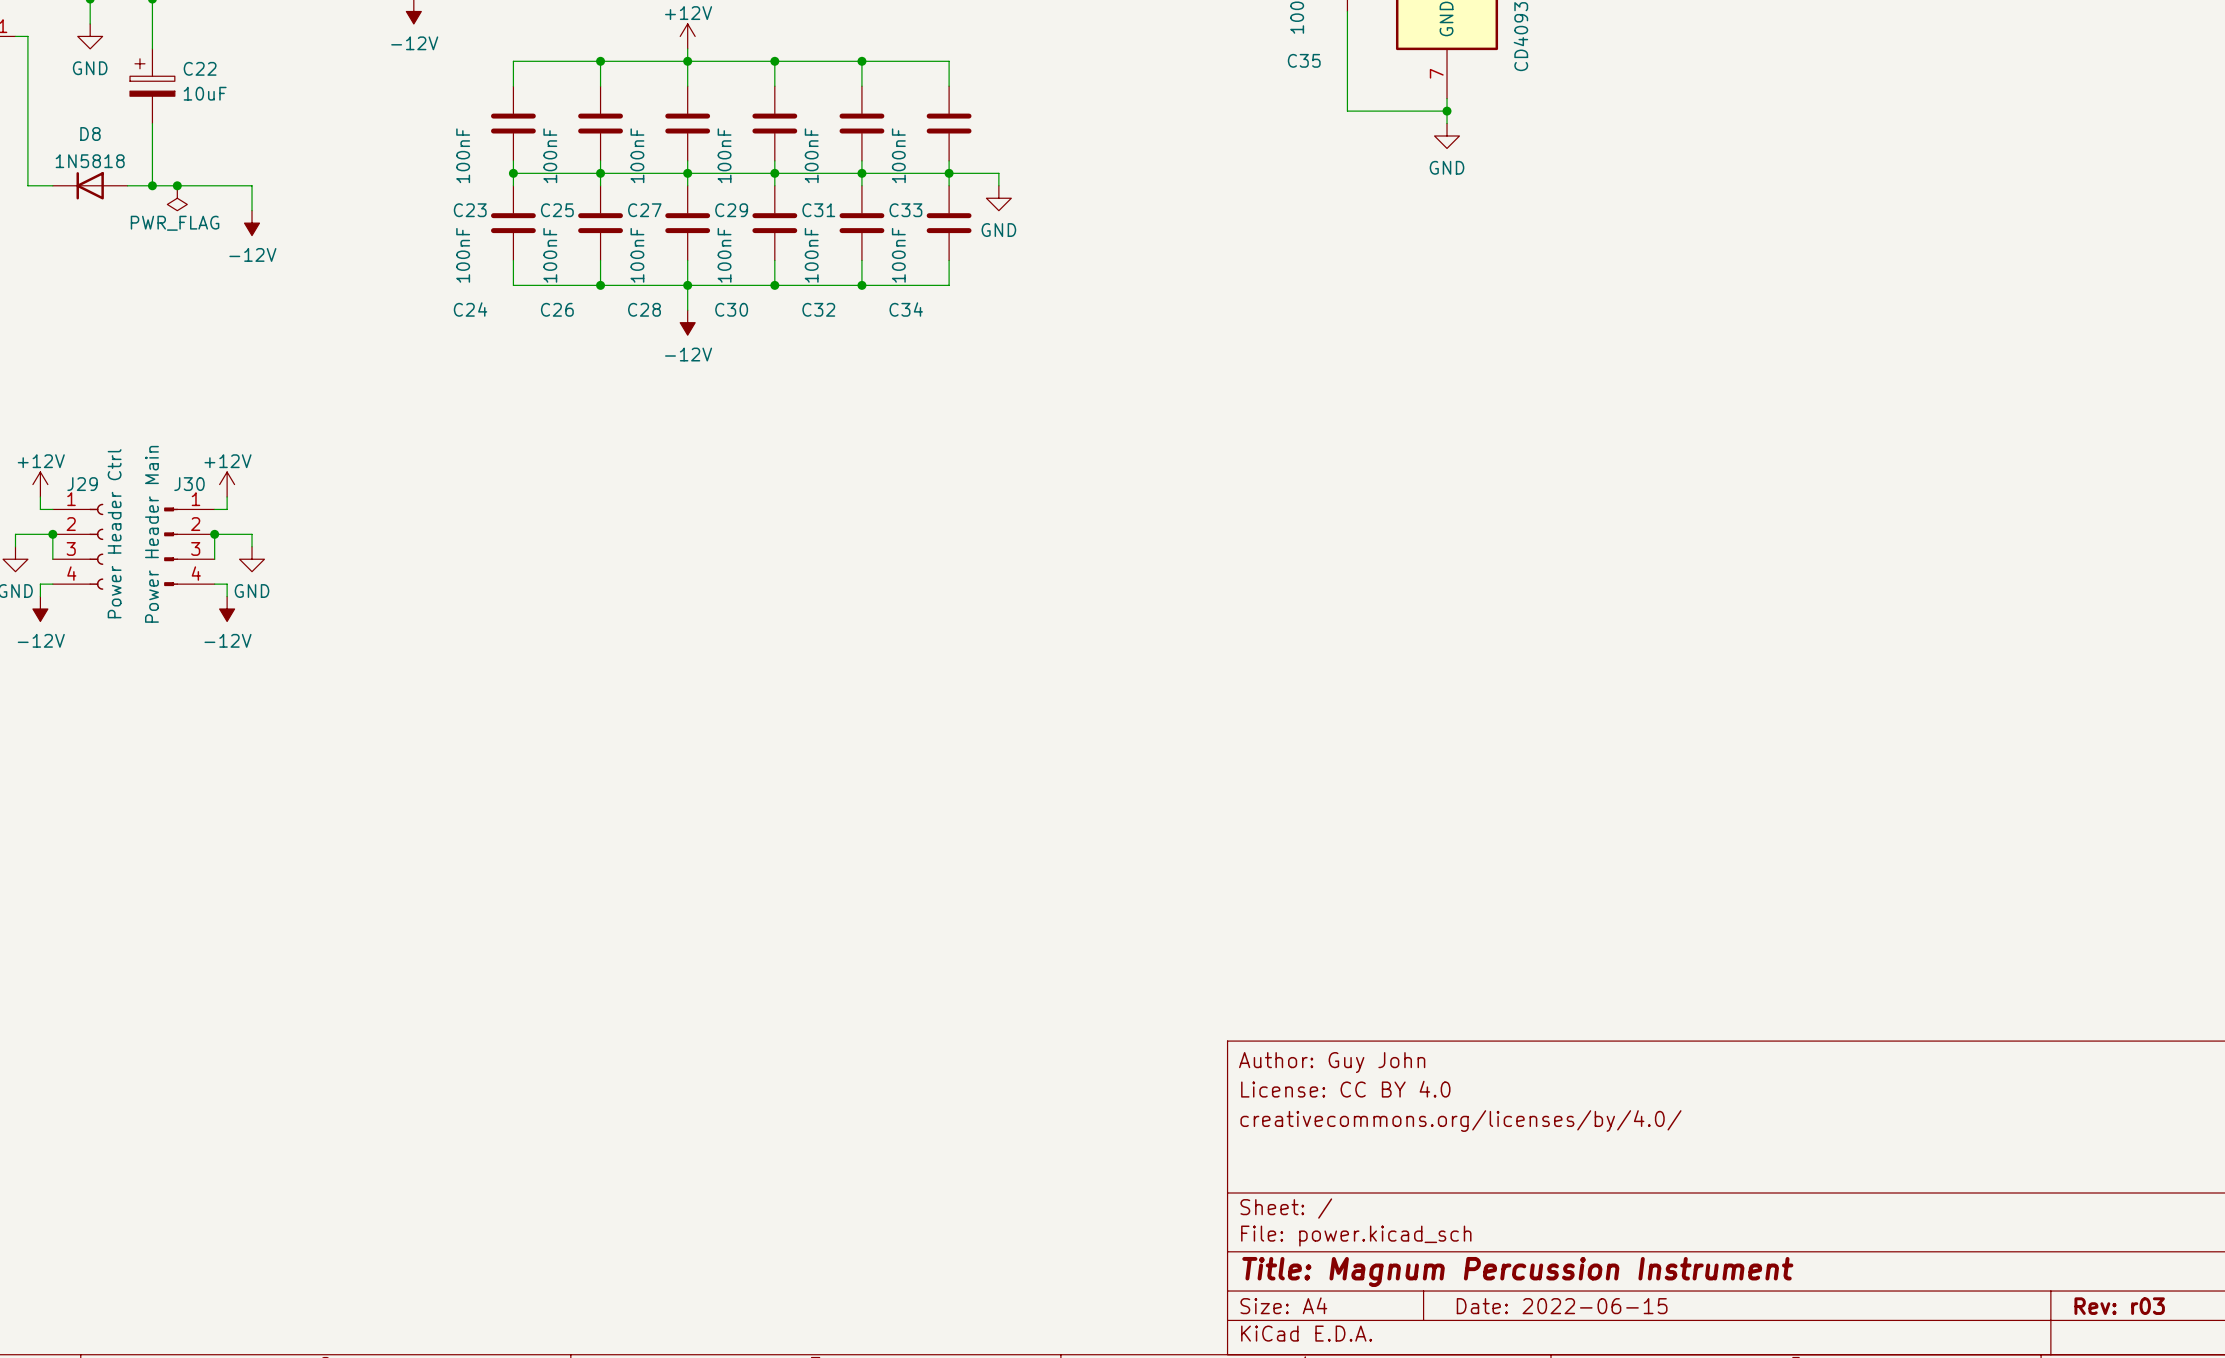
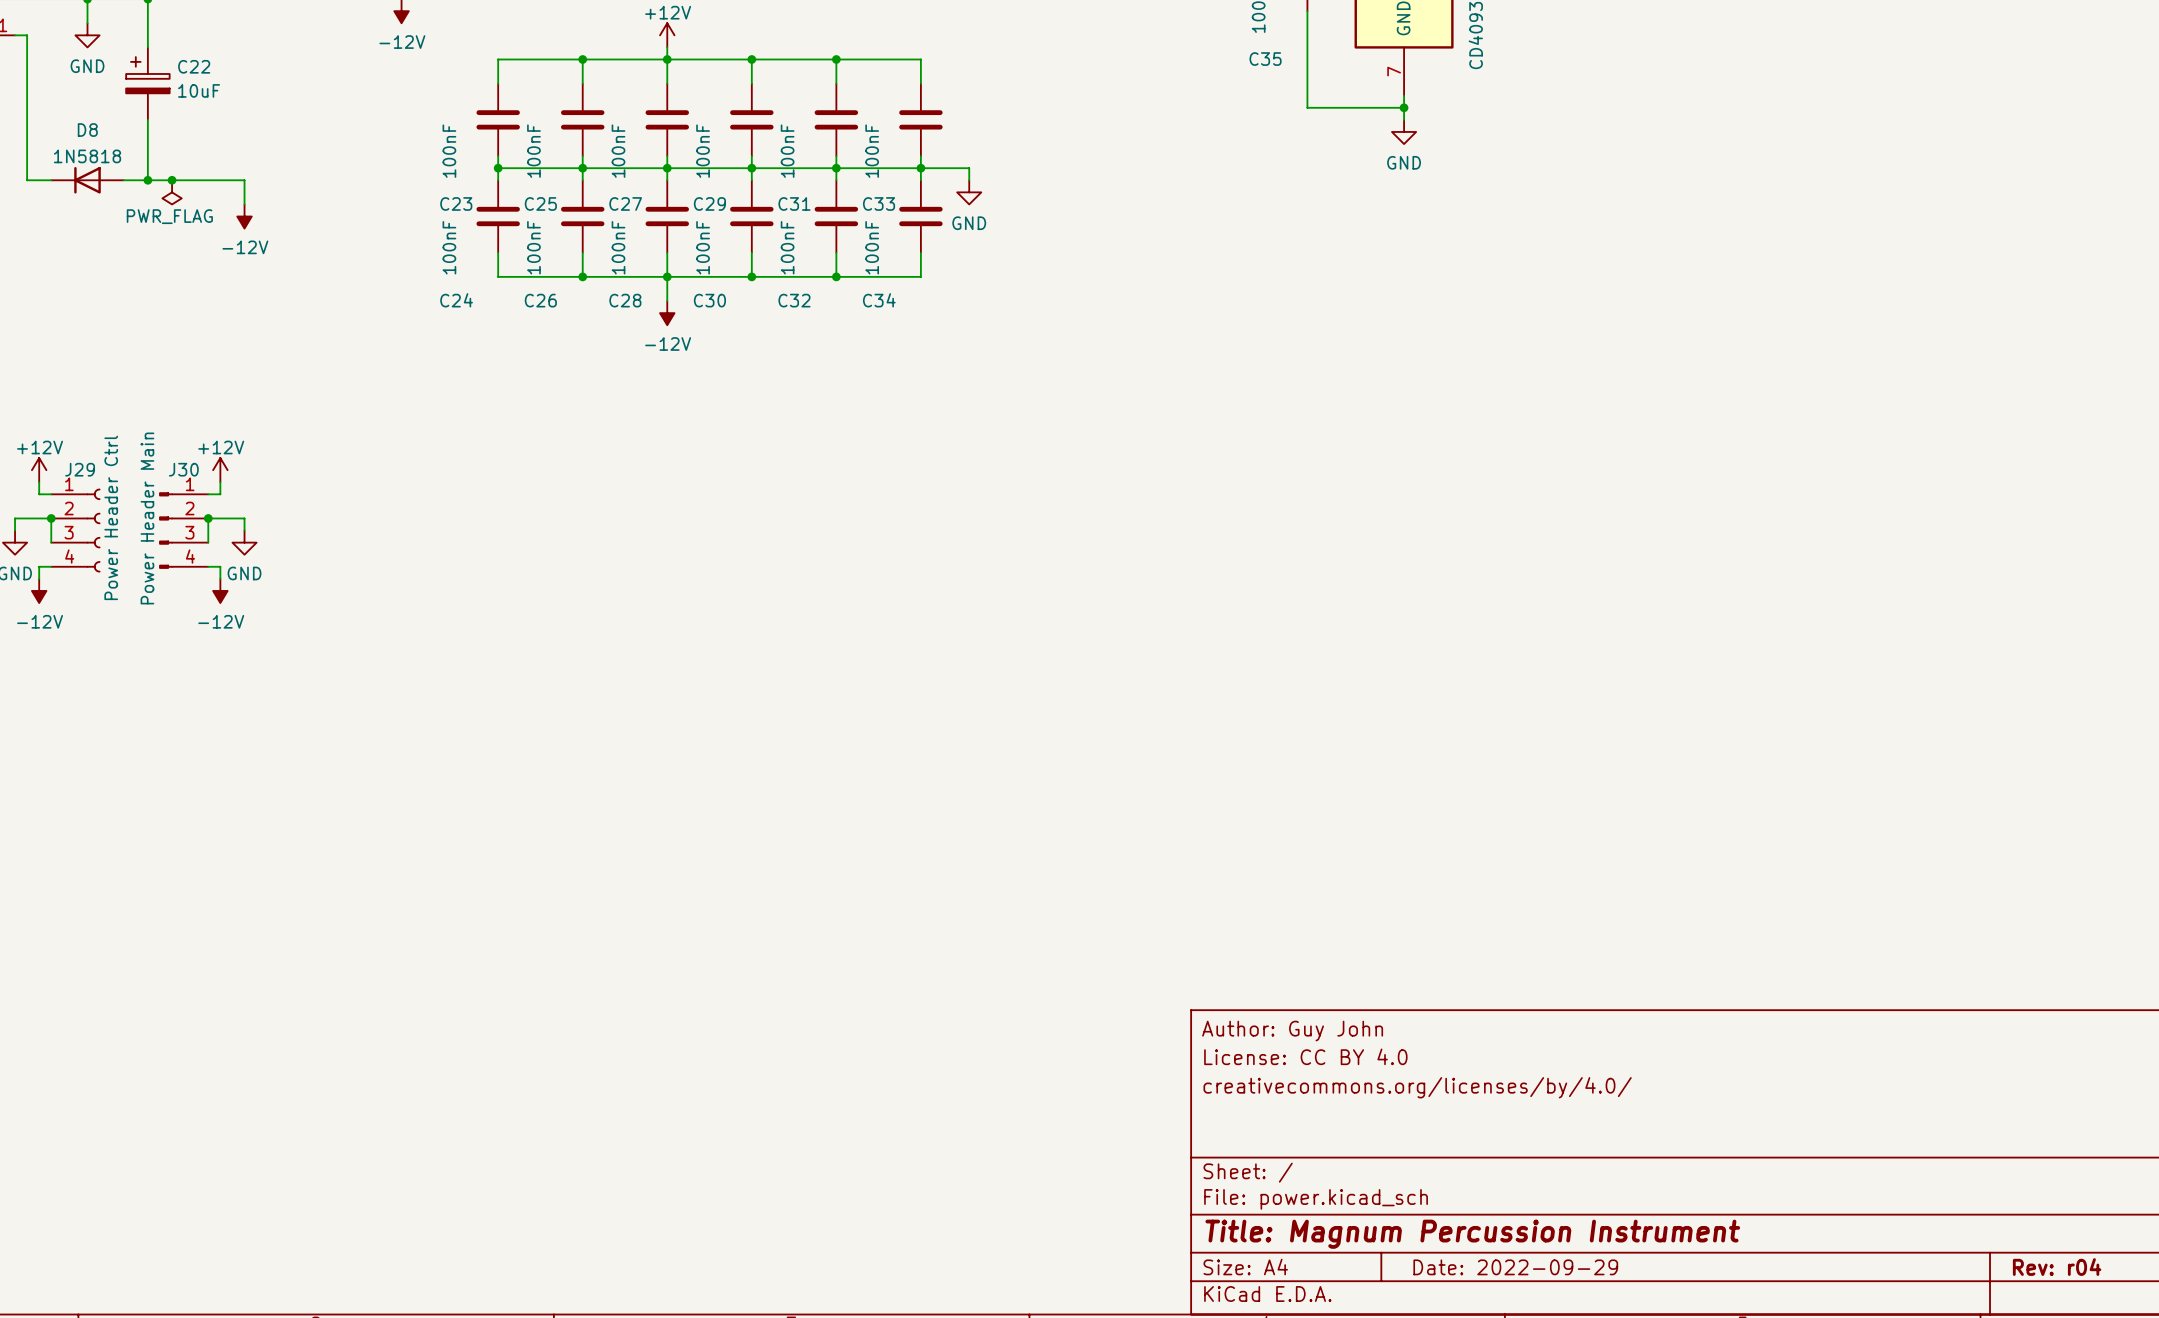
title block: Date: 2022-06-15 (1562, 1306) -> Date: 2022-09-29 (1515, 1267)
title block: Rev: r03 (2119, 1306) -> Rev: r04 (2057, 1267)

